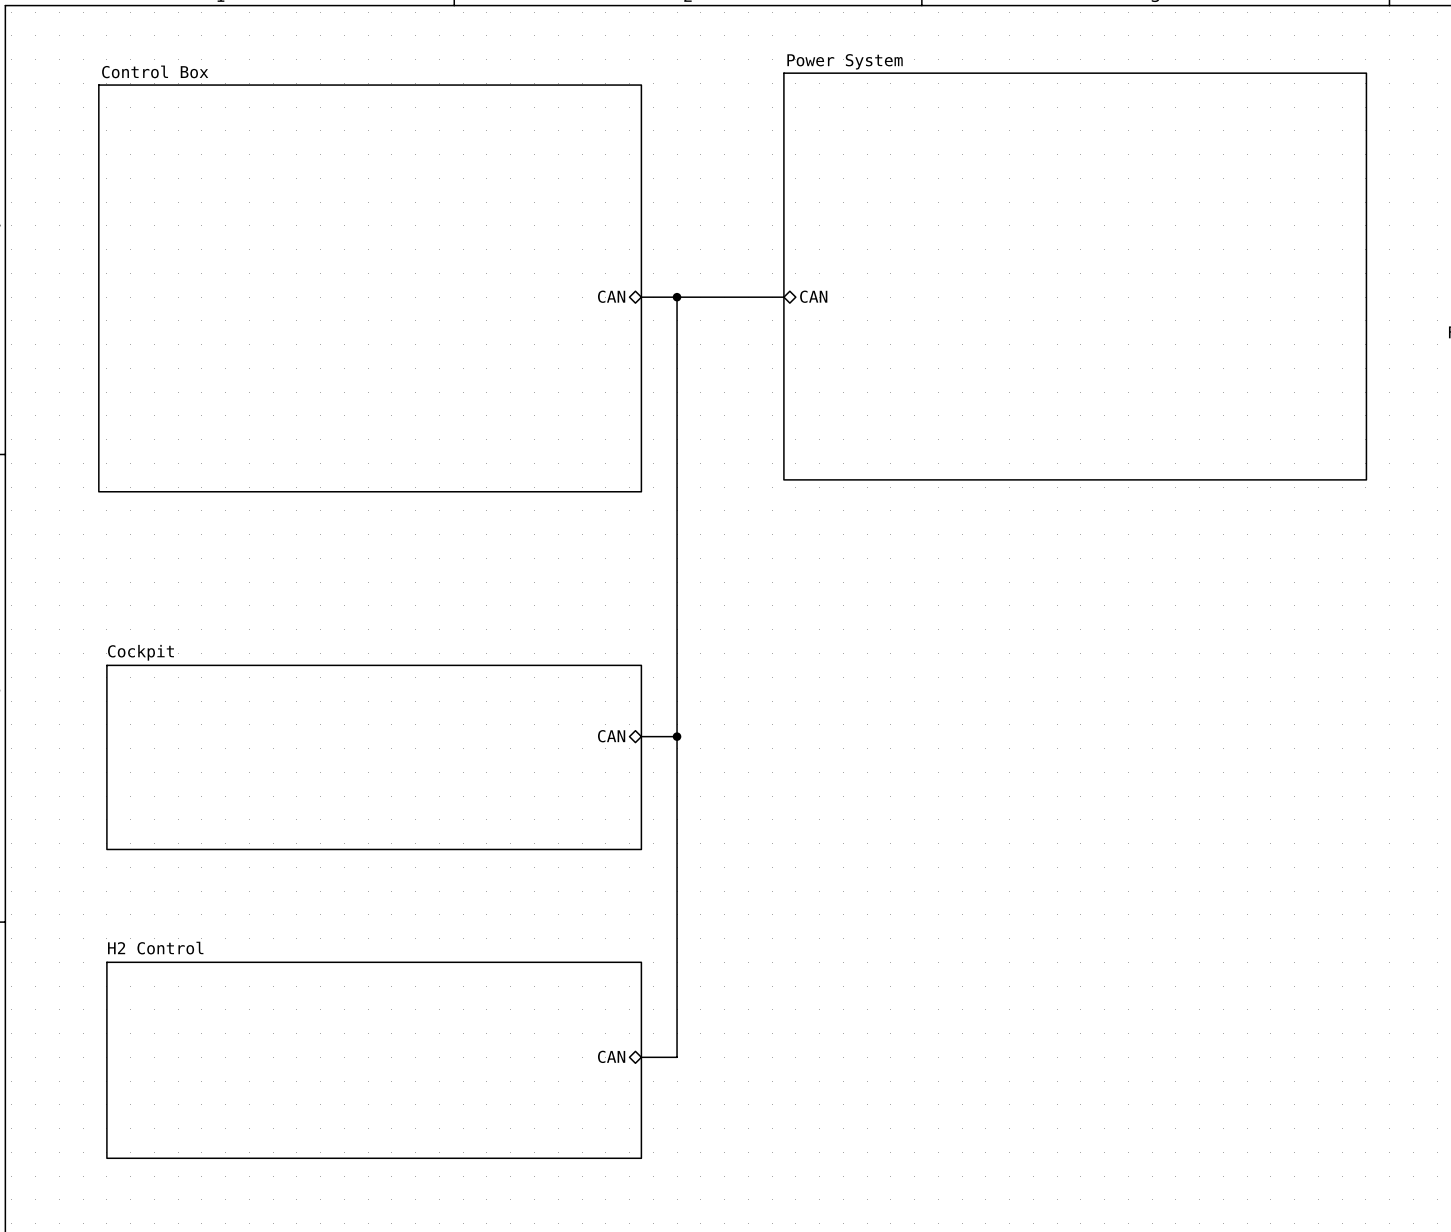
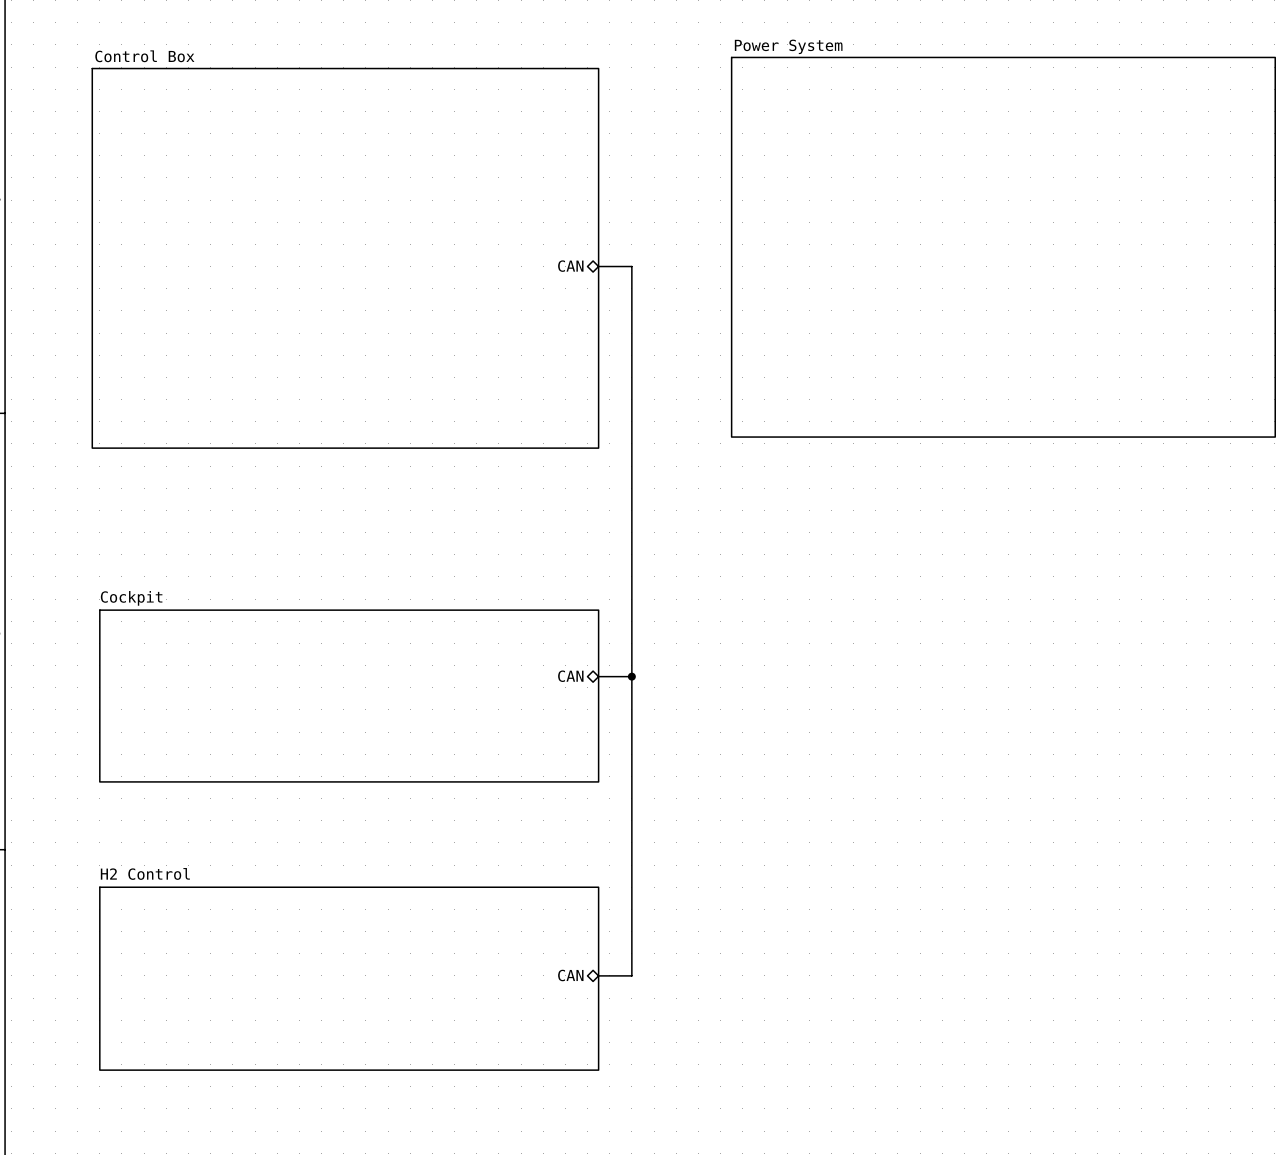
sheet pin: CAN (813, 296) -> none
bus: (677, 297) (783, 297) -> none
junction: (677, 297) -> none

